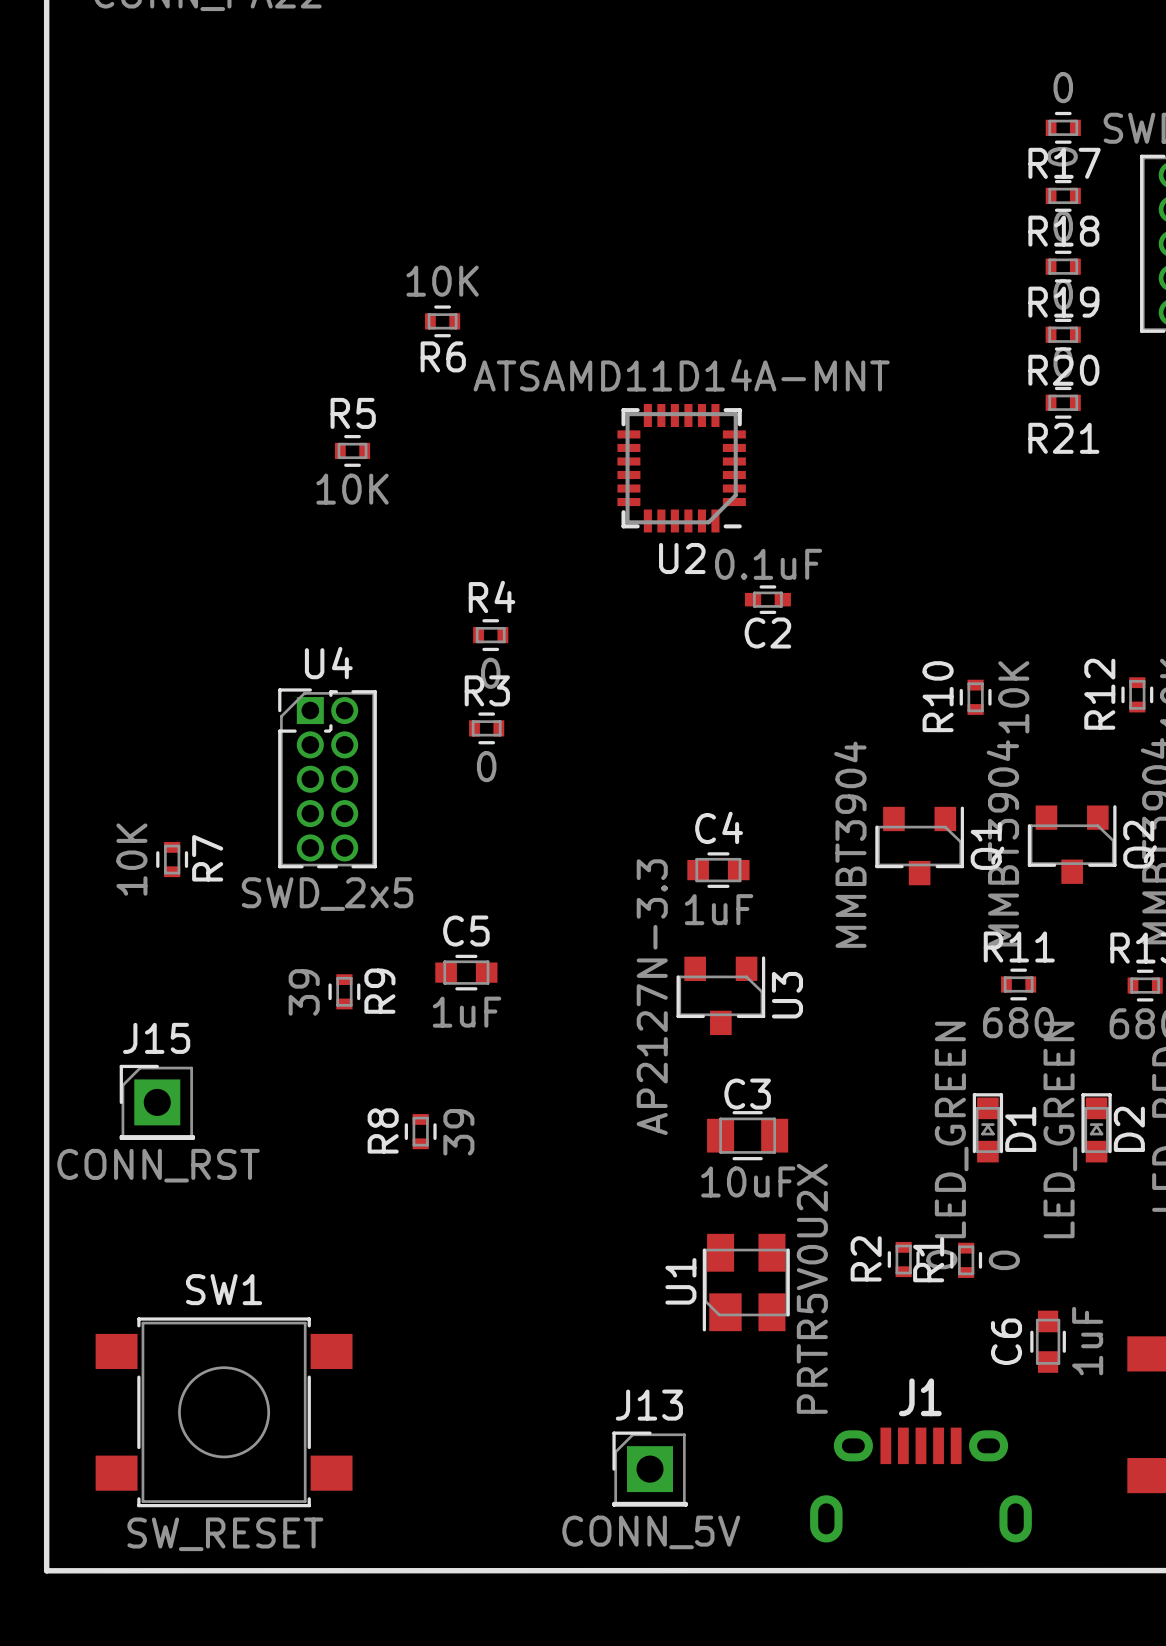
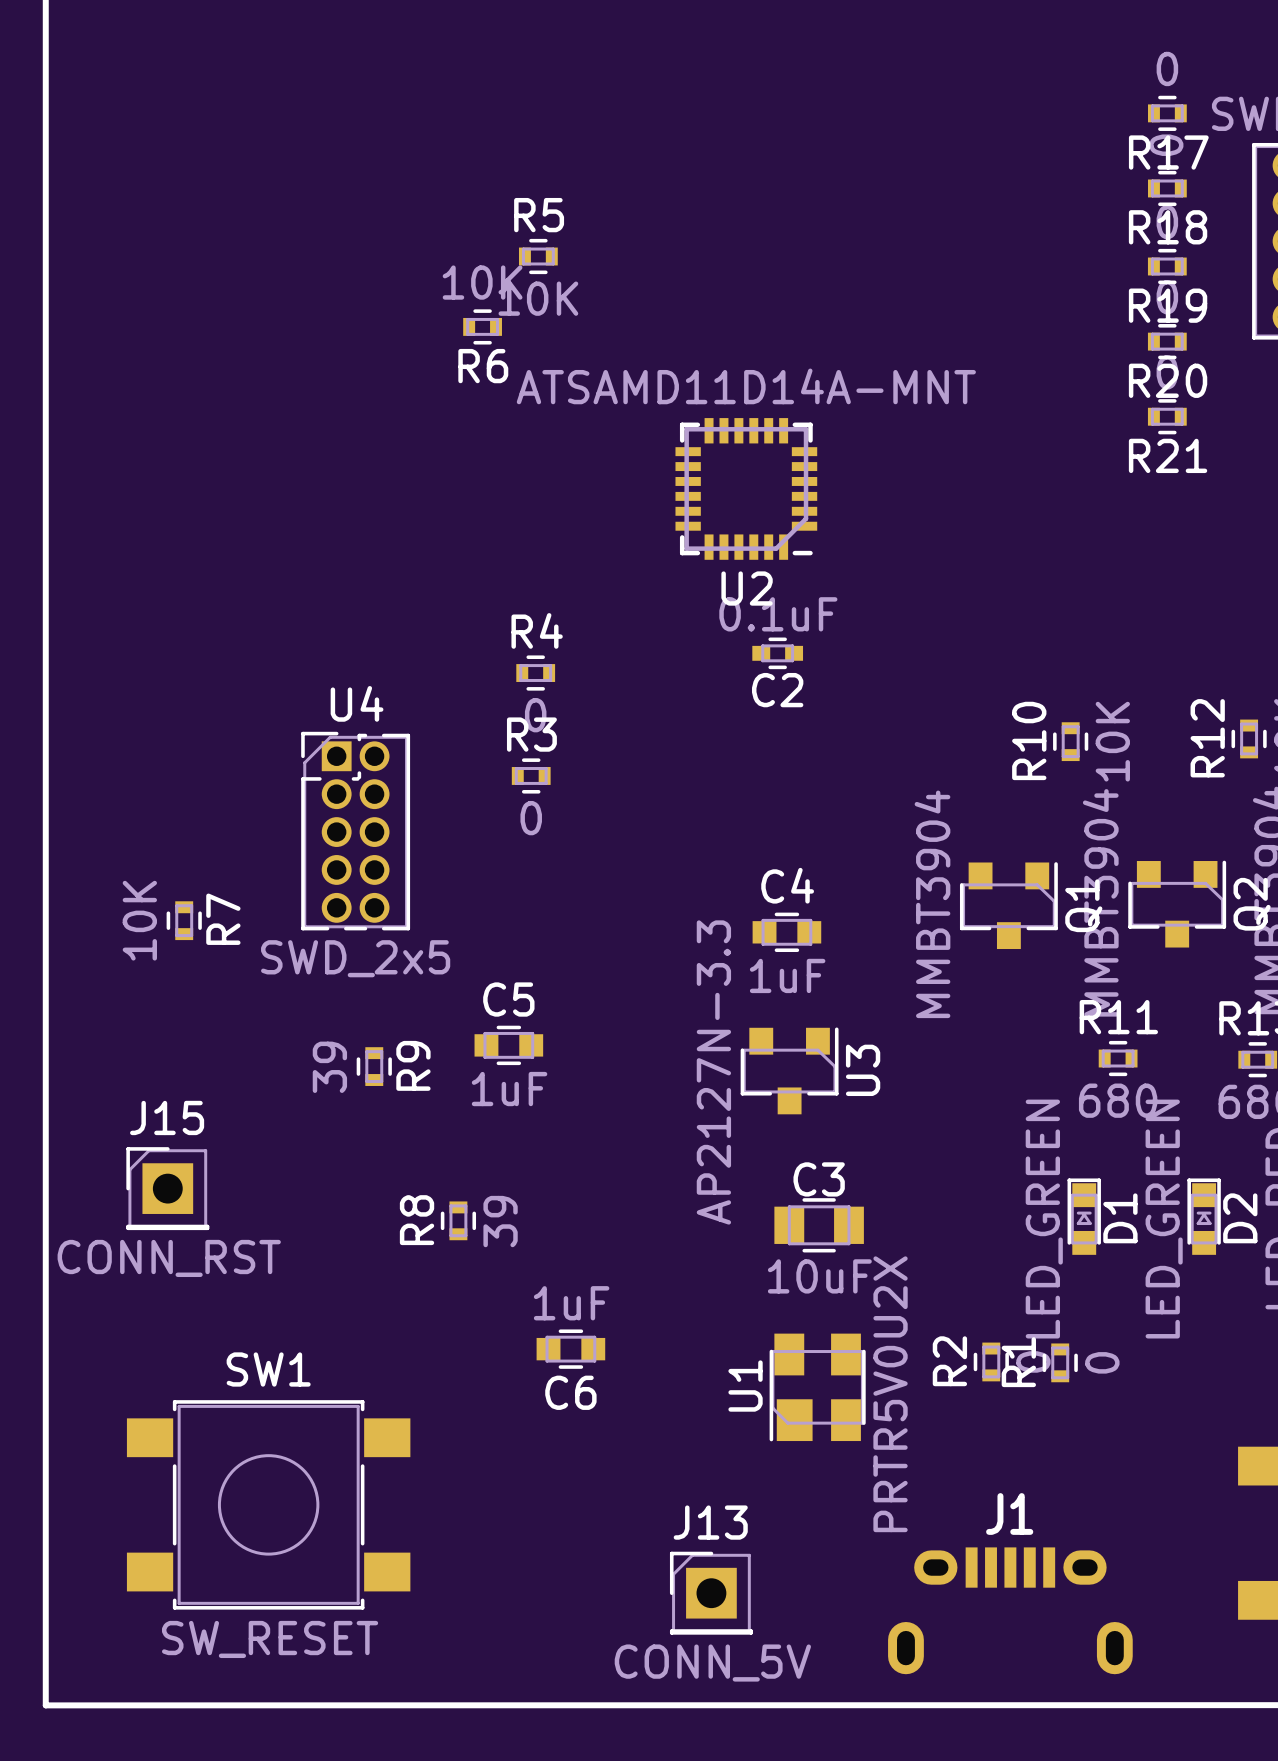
R5 position: (352, 450) -> (538, 256)
C2 position: (767, 599) -> (777, 653)
C6 name position: C6 (1006, 1341) -> C6 (570, 1392)
C6 rotation: 0° (1048, 1341) -> 90° clockwise (570, 1349)
C6 position: (1048, 1341) -> (570, 1349)
C6 value position: 1uF (1087, 1341) -> 1uF (571, 1303)
SW1 position: (224, 1412) -> (268, 1504)

